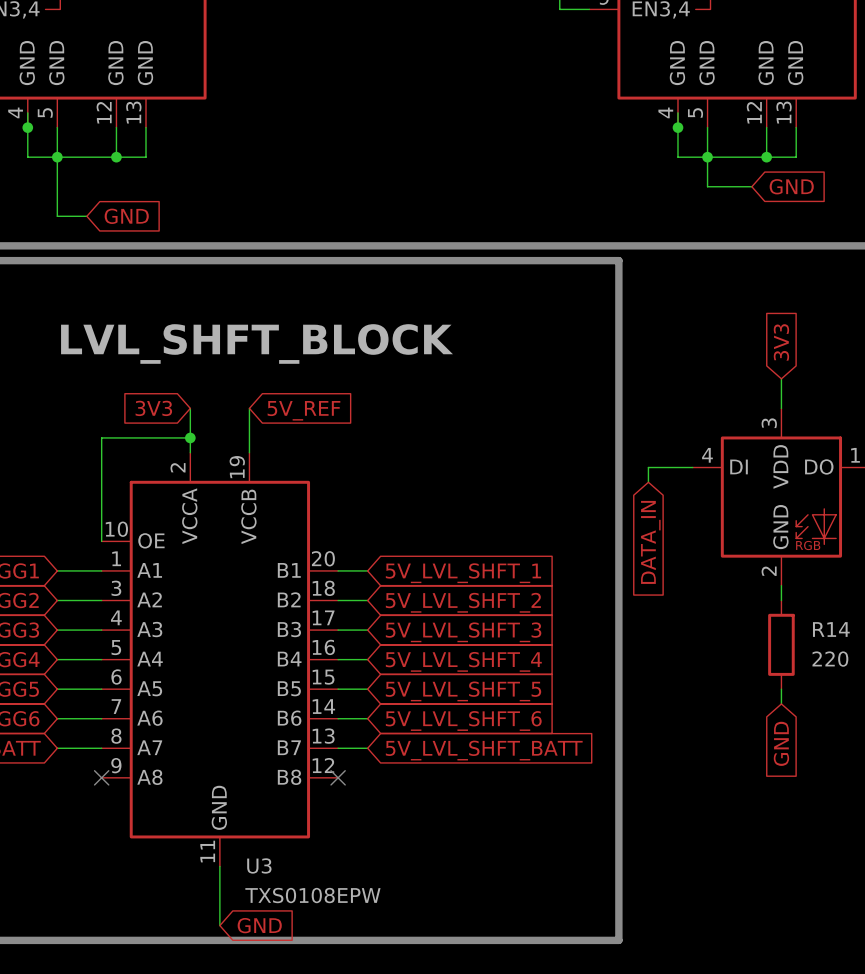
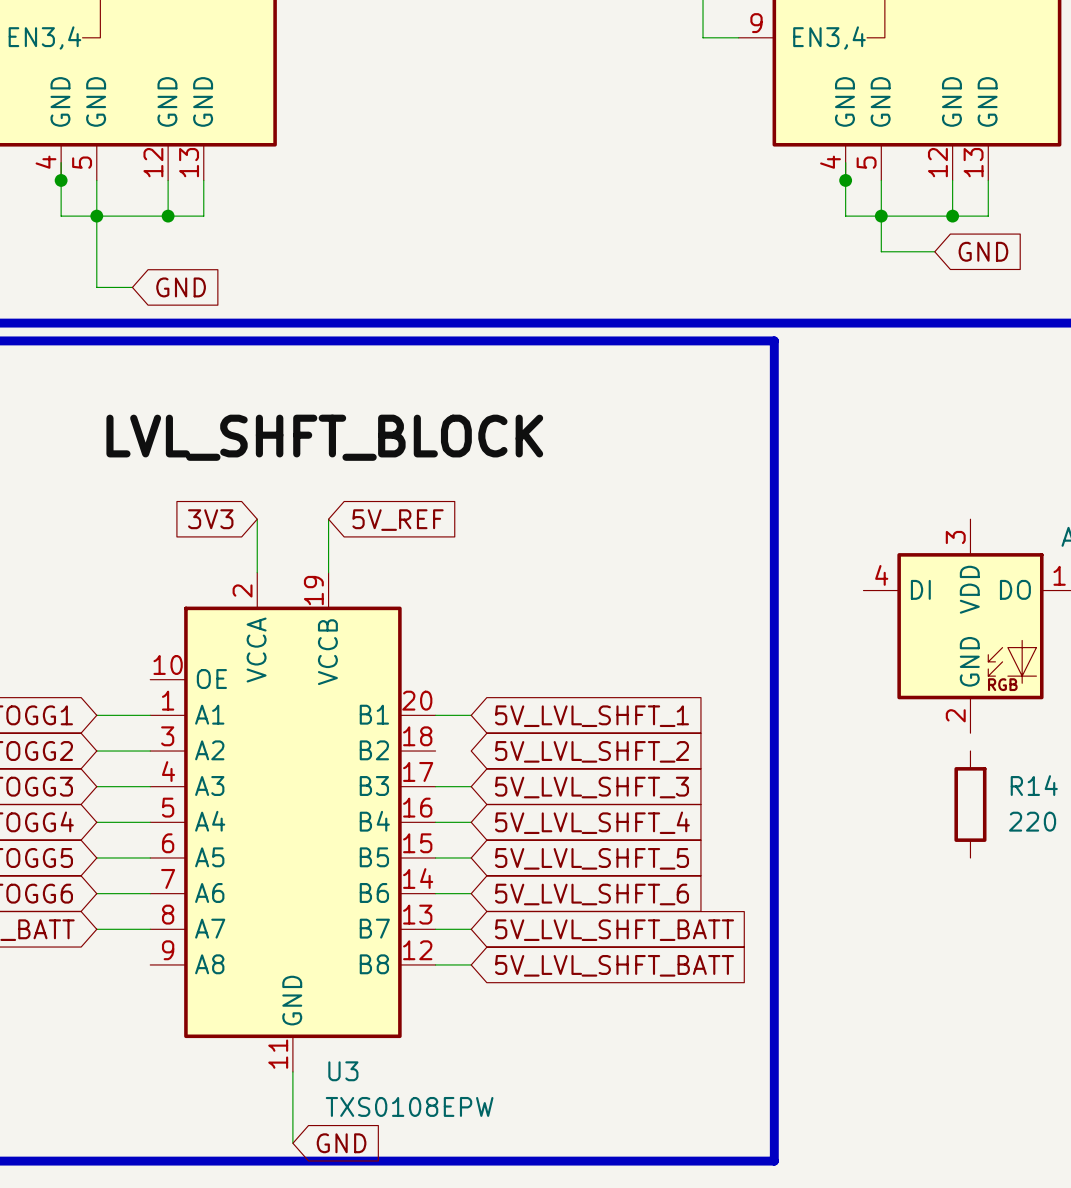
global label: 3V3 (781, 342) -> none
wire: (781, 378) (781, 408) -> none
wire: (190, 437) (101, 437) (101, 541) -> none
junction: (190, 437) -> none
wire: (692, 467) (648, 467) (648, 482) -> none
global label: DATA_IN (650, 542) -> none
wire: (781, 585) (781, 600) -> none
wire: (338, 600) (367, 600) -> (435, 964) (471, 964)
wire: (781, 689) (781, 703) -> none
global label: GND (781, 743) -> none
no-connect mark: (101, 777) -> none
no-connect mark: (338, 777) -> none
global label: none -> 5V_LVL_SHFT_BATT (614, 965)

